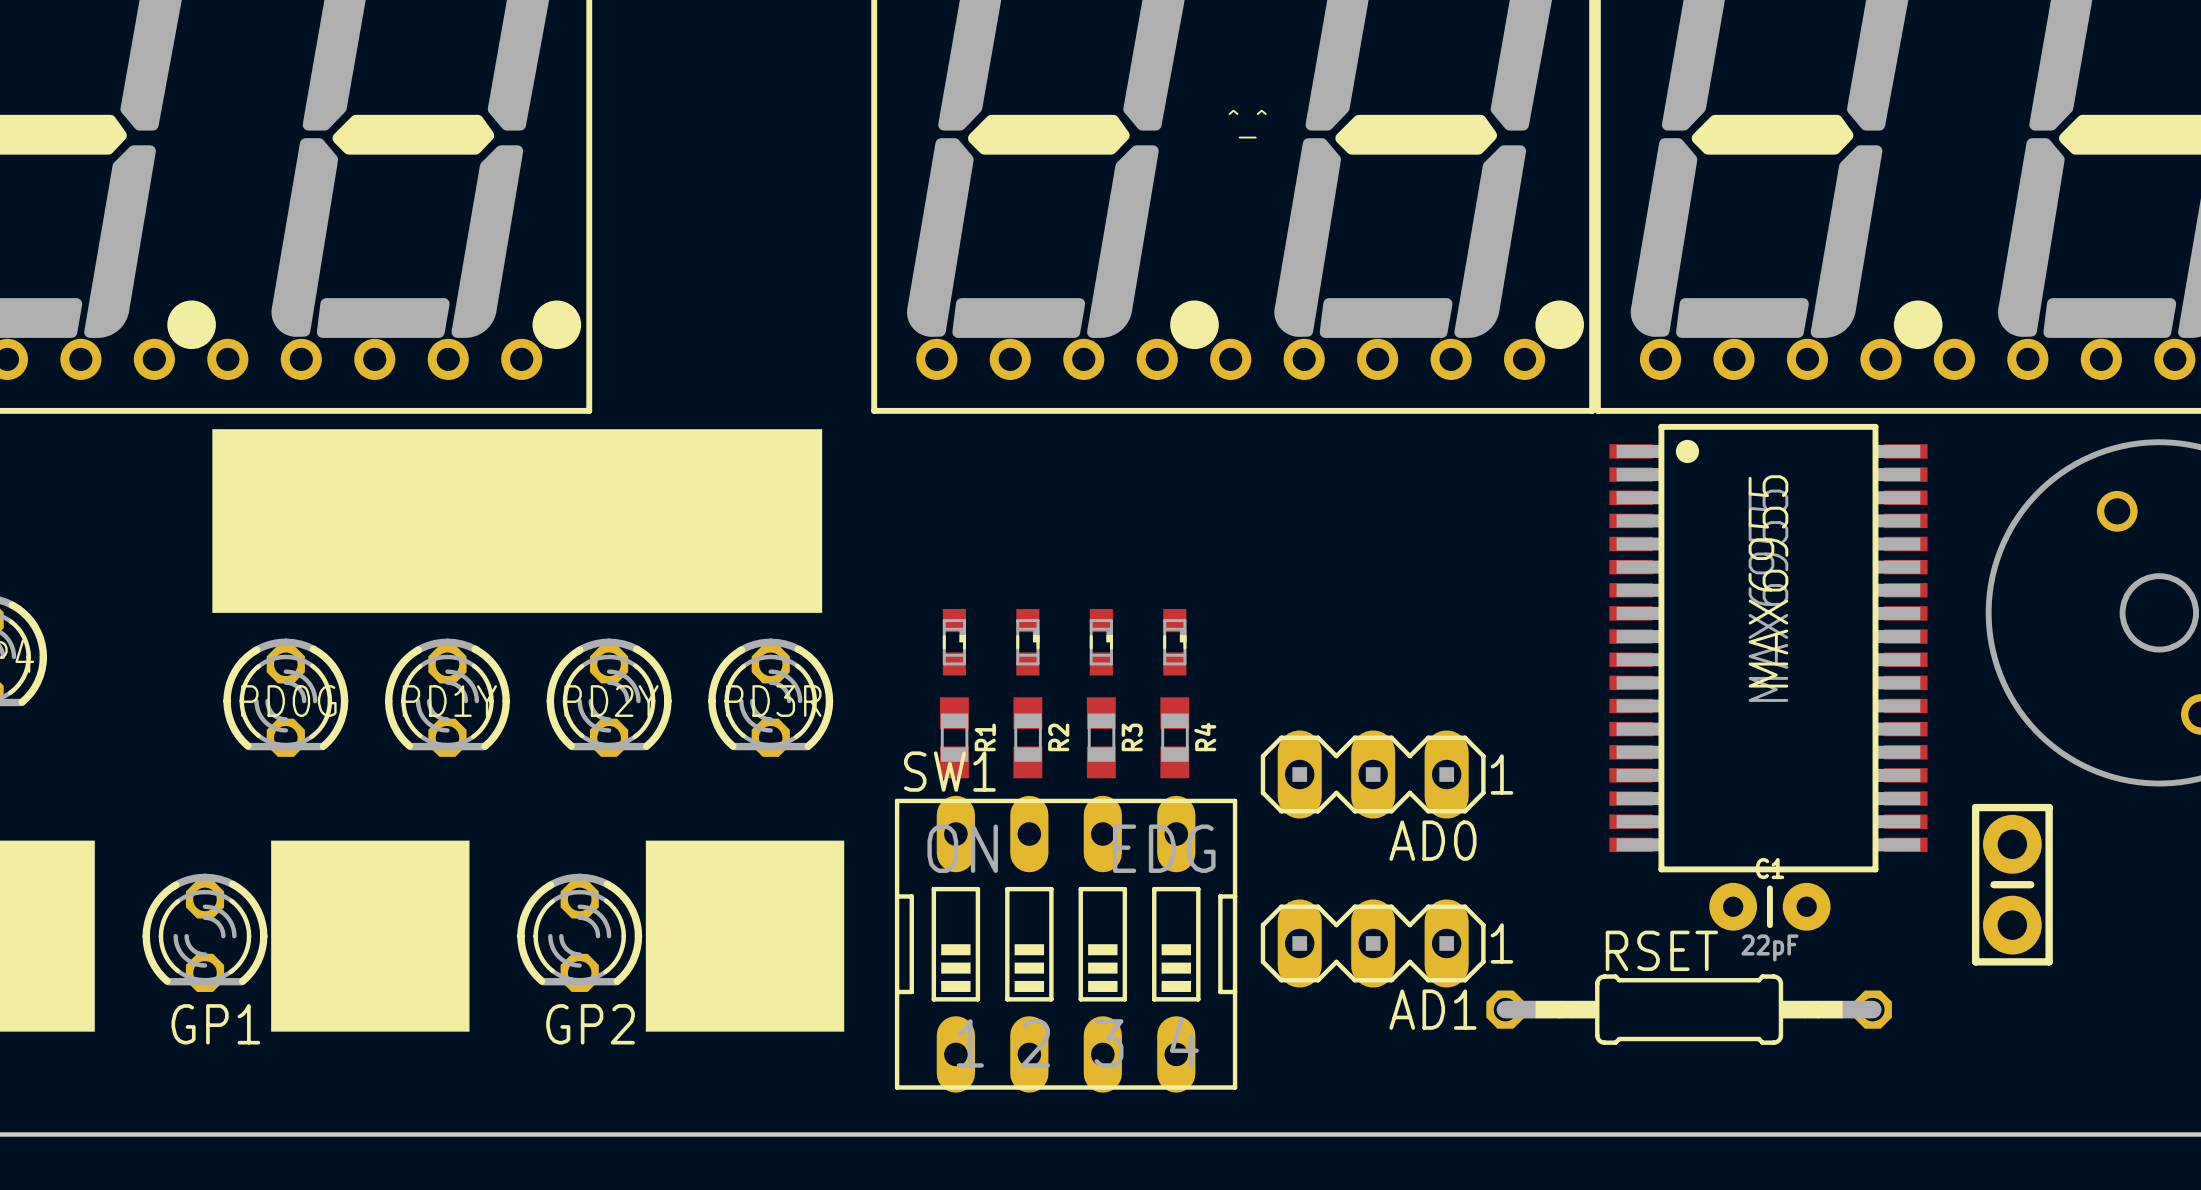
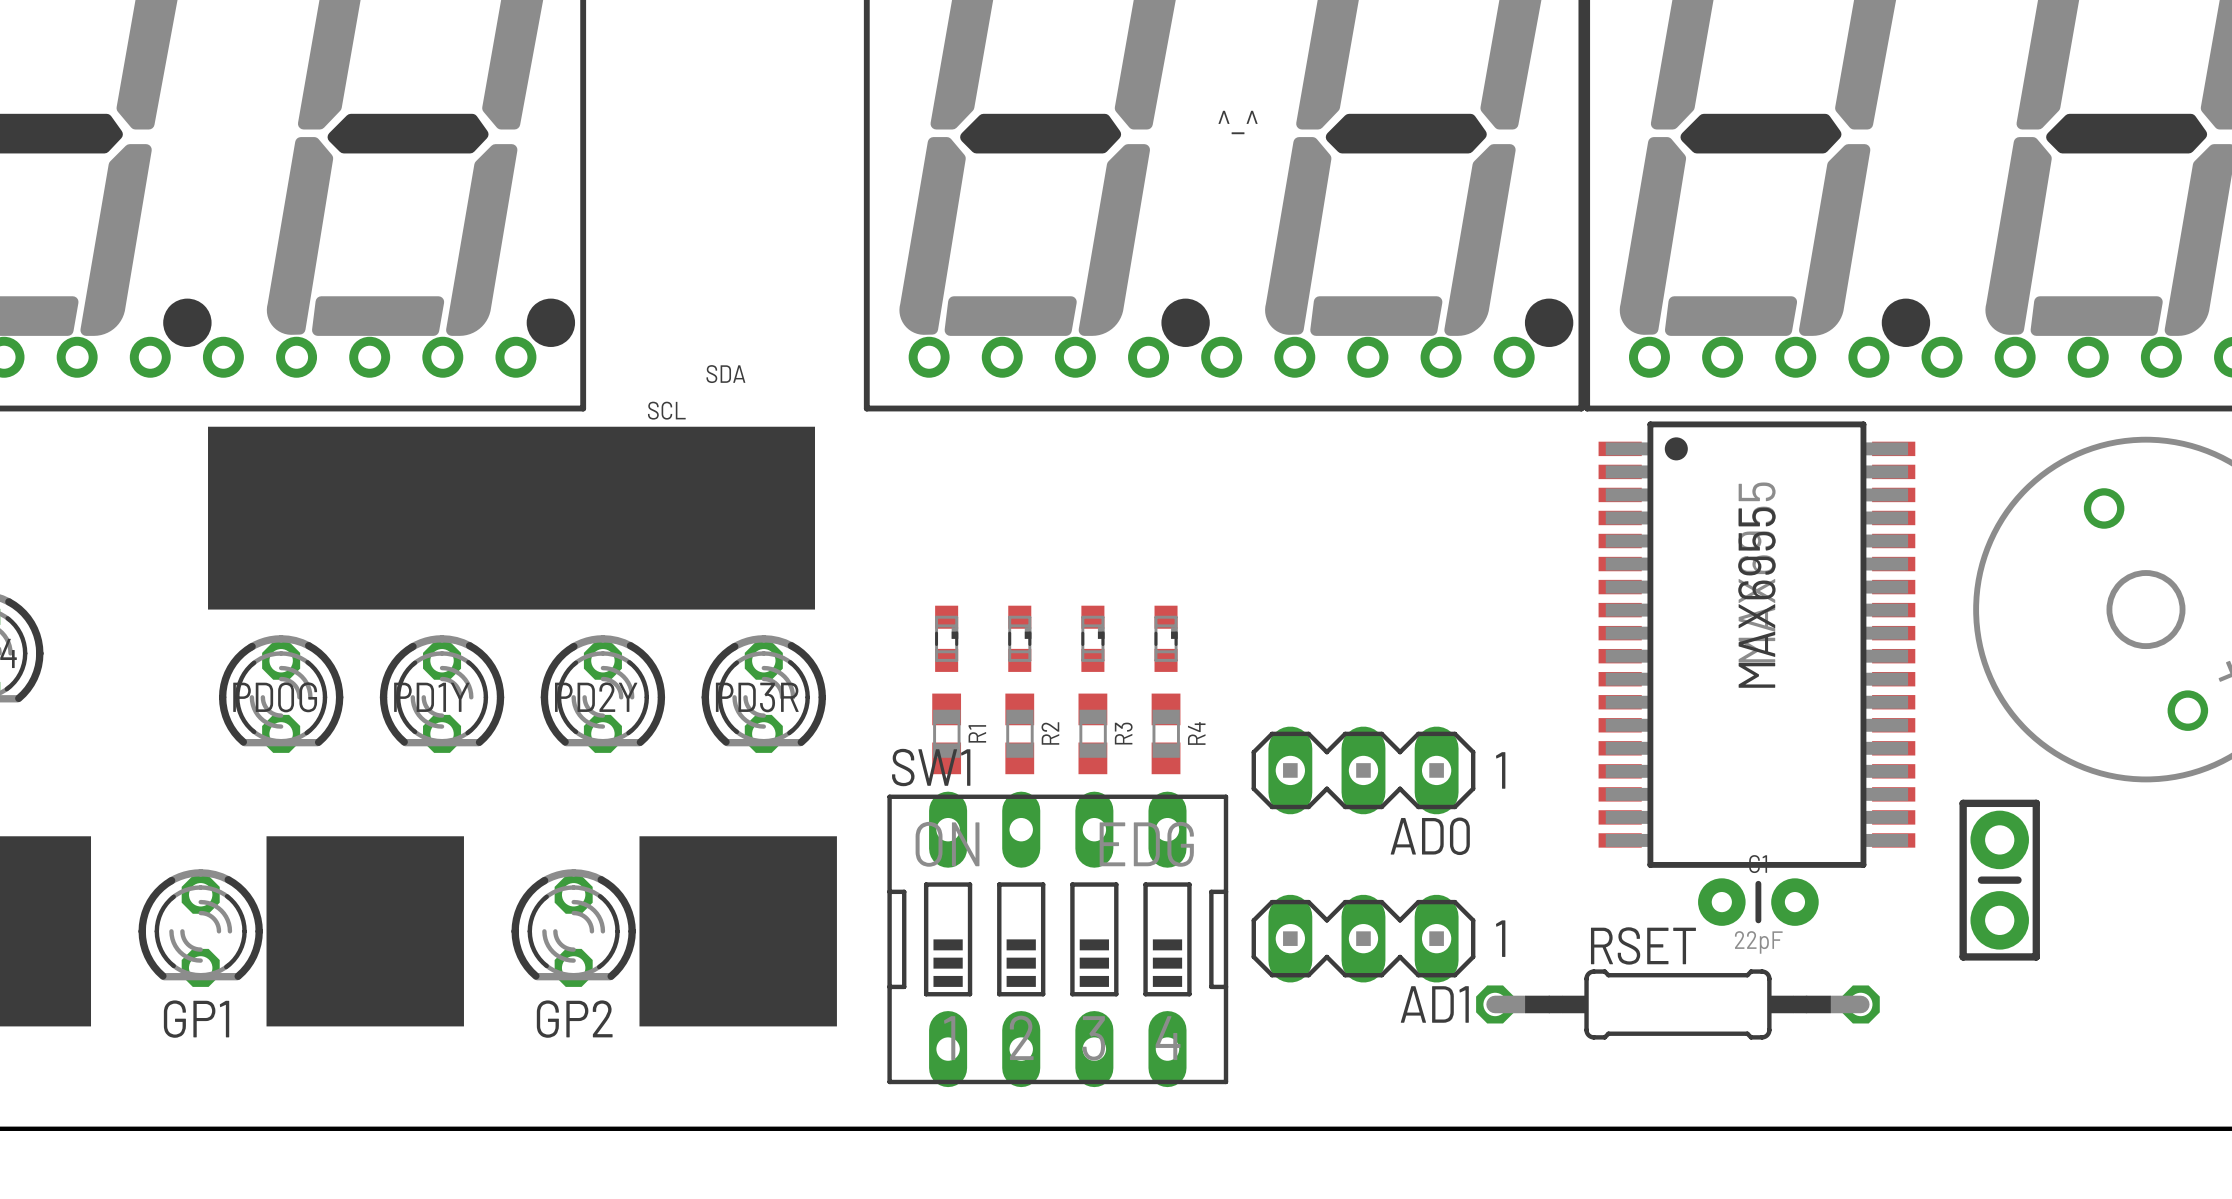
text: none -> SDA (725, 374)
text: none -> SCL (666, 410)

